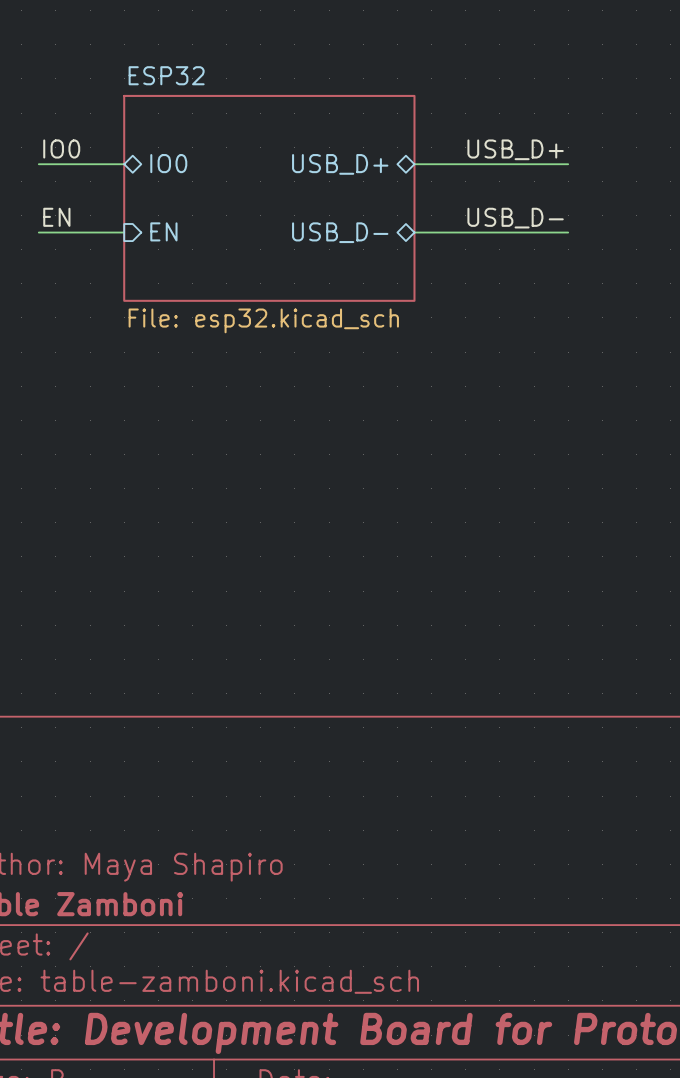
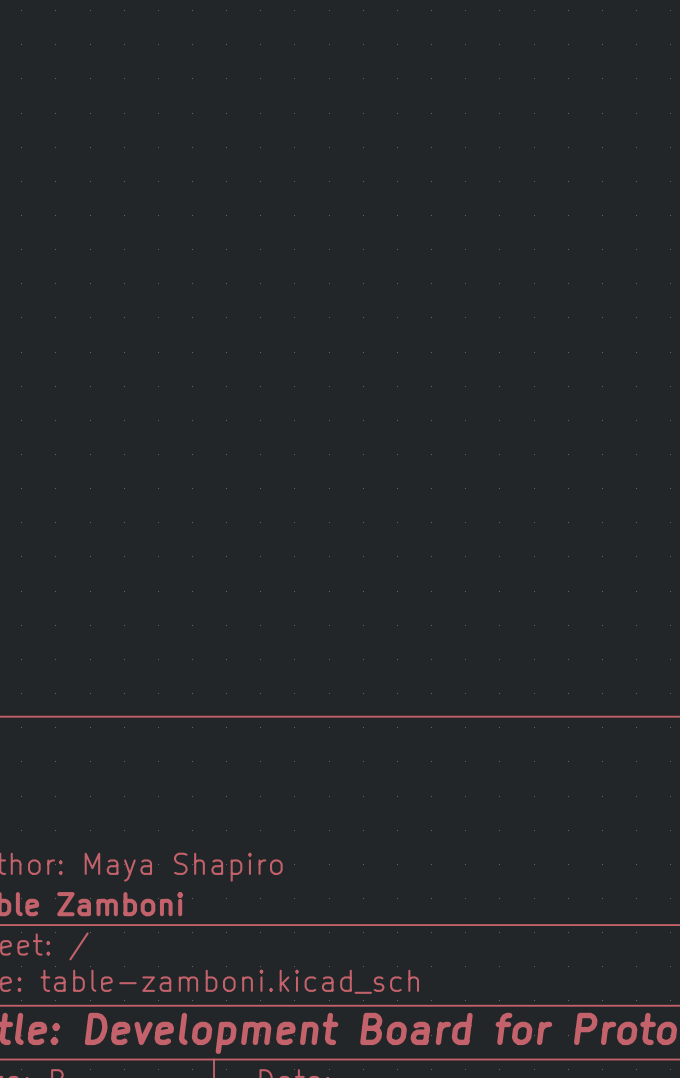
label: IO0 (61, 148) -> none
label: USB_D+ (515, 149) -> none
sheet pin: IO0 (168, 163) -> none
wire: (38, 164) (124, 164) -> none
sheet pin: USB_D+ (340, 164) -> none
wire: (414, 164) (568, 164) -> none
sheet ESP32: File: esp32.kicad_sch (269, 198) -> none
label: EN (56, 217) -> none
label: USB_D- (515, 218) -> none
sheet pin: EN (163, 231) -> none
wire: (38, 232) (124, 232) -> none
sheet pin: USB_D- (340, 232) -> none
wire: (414, 232) (568, 232) -> none

